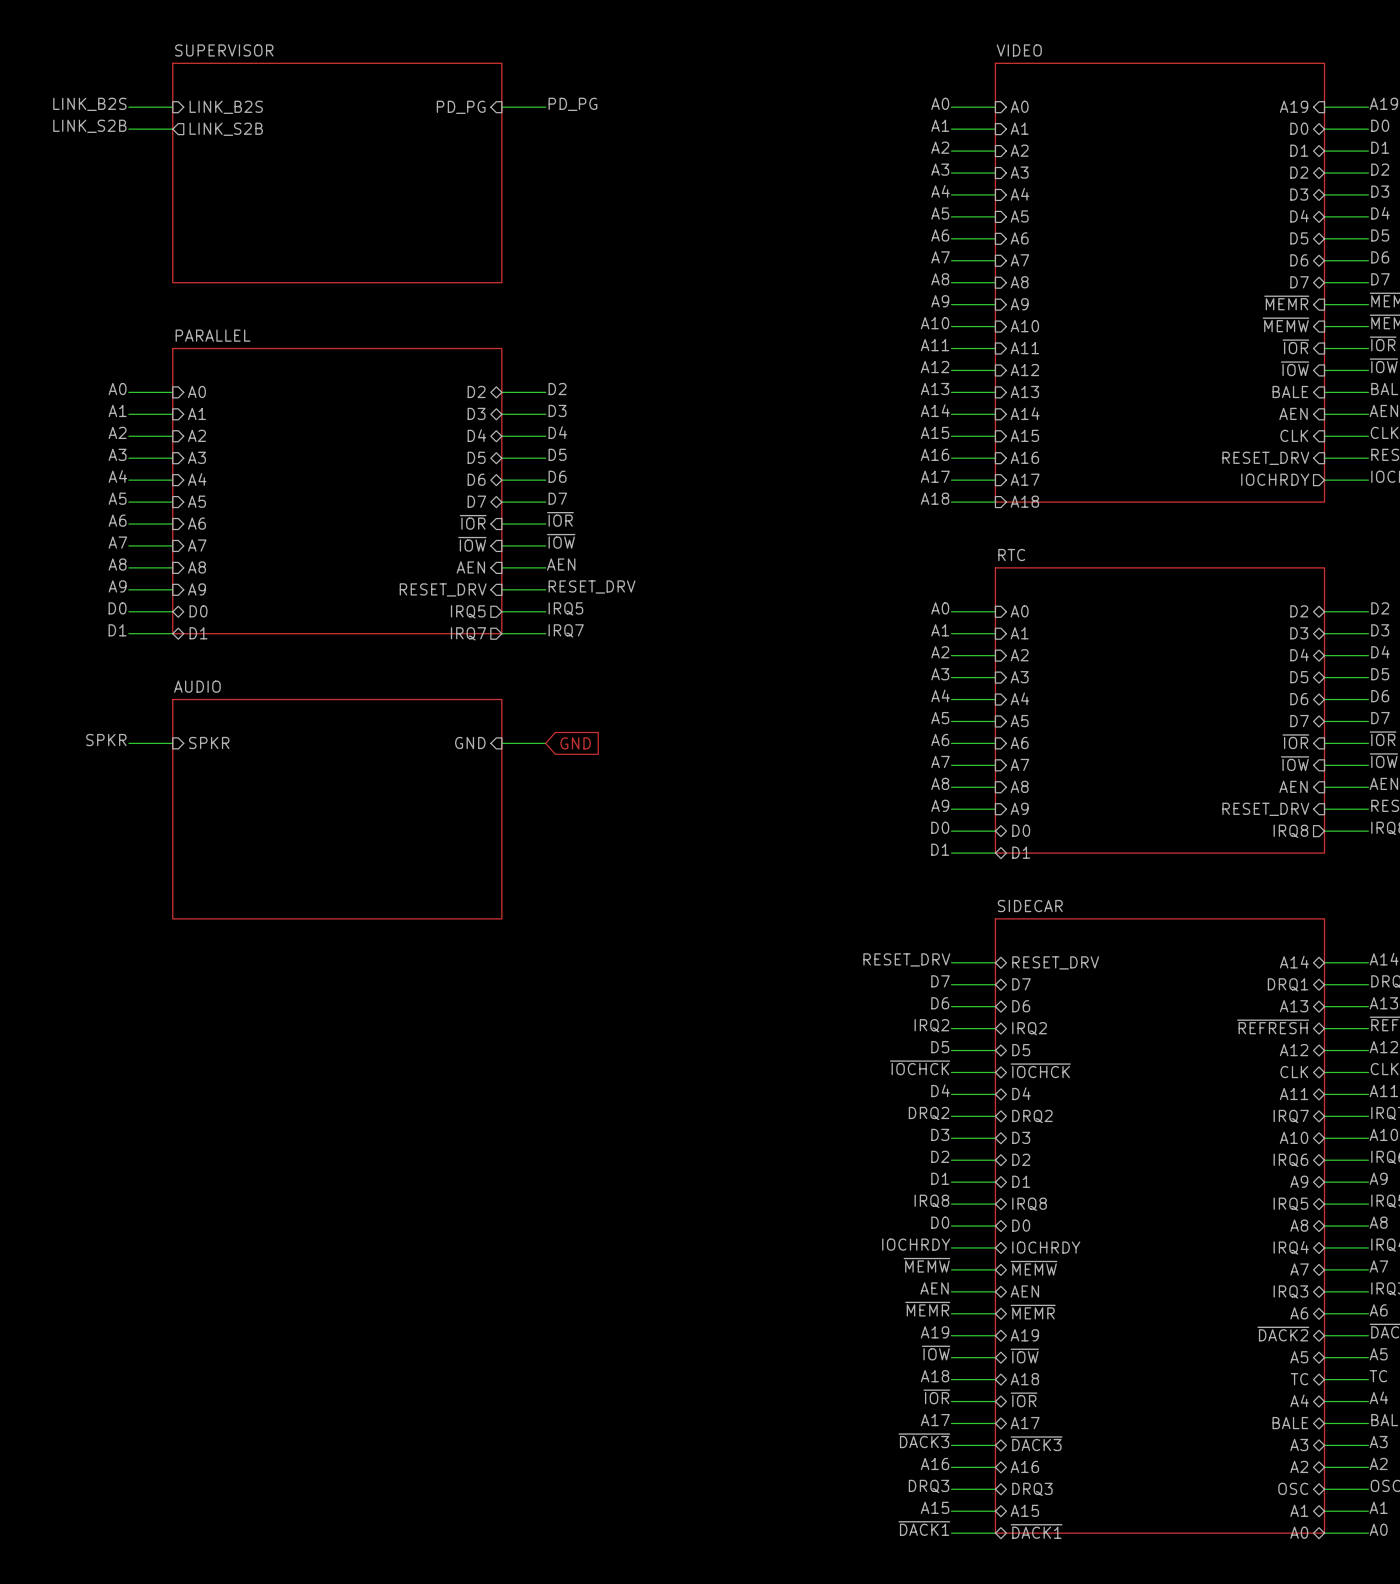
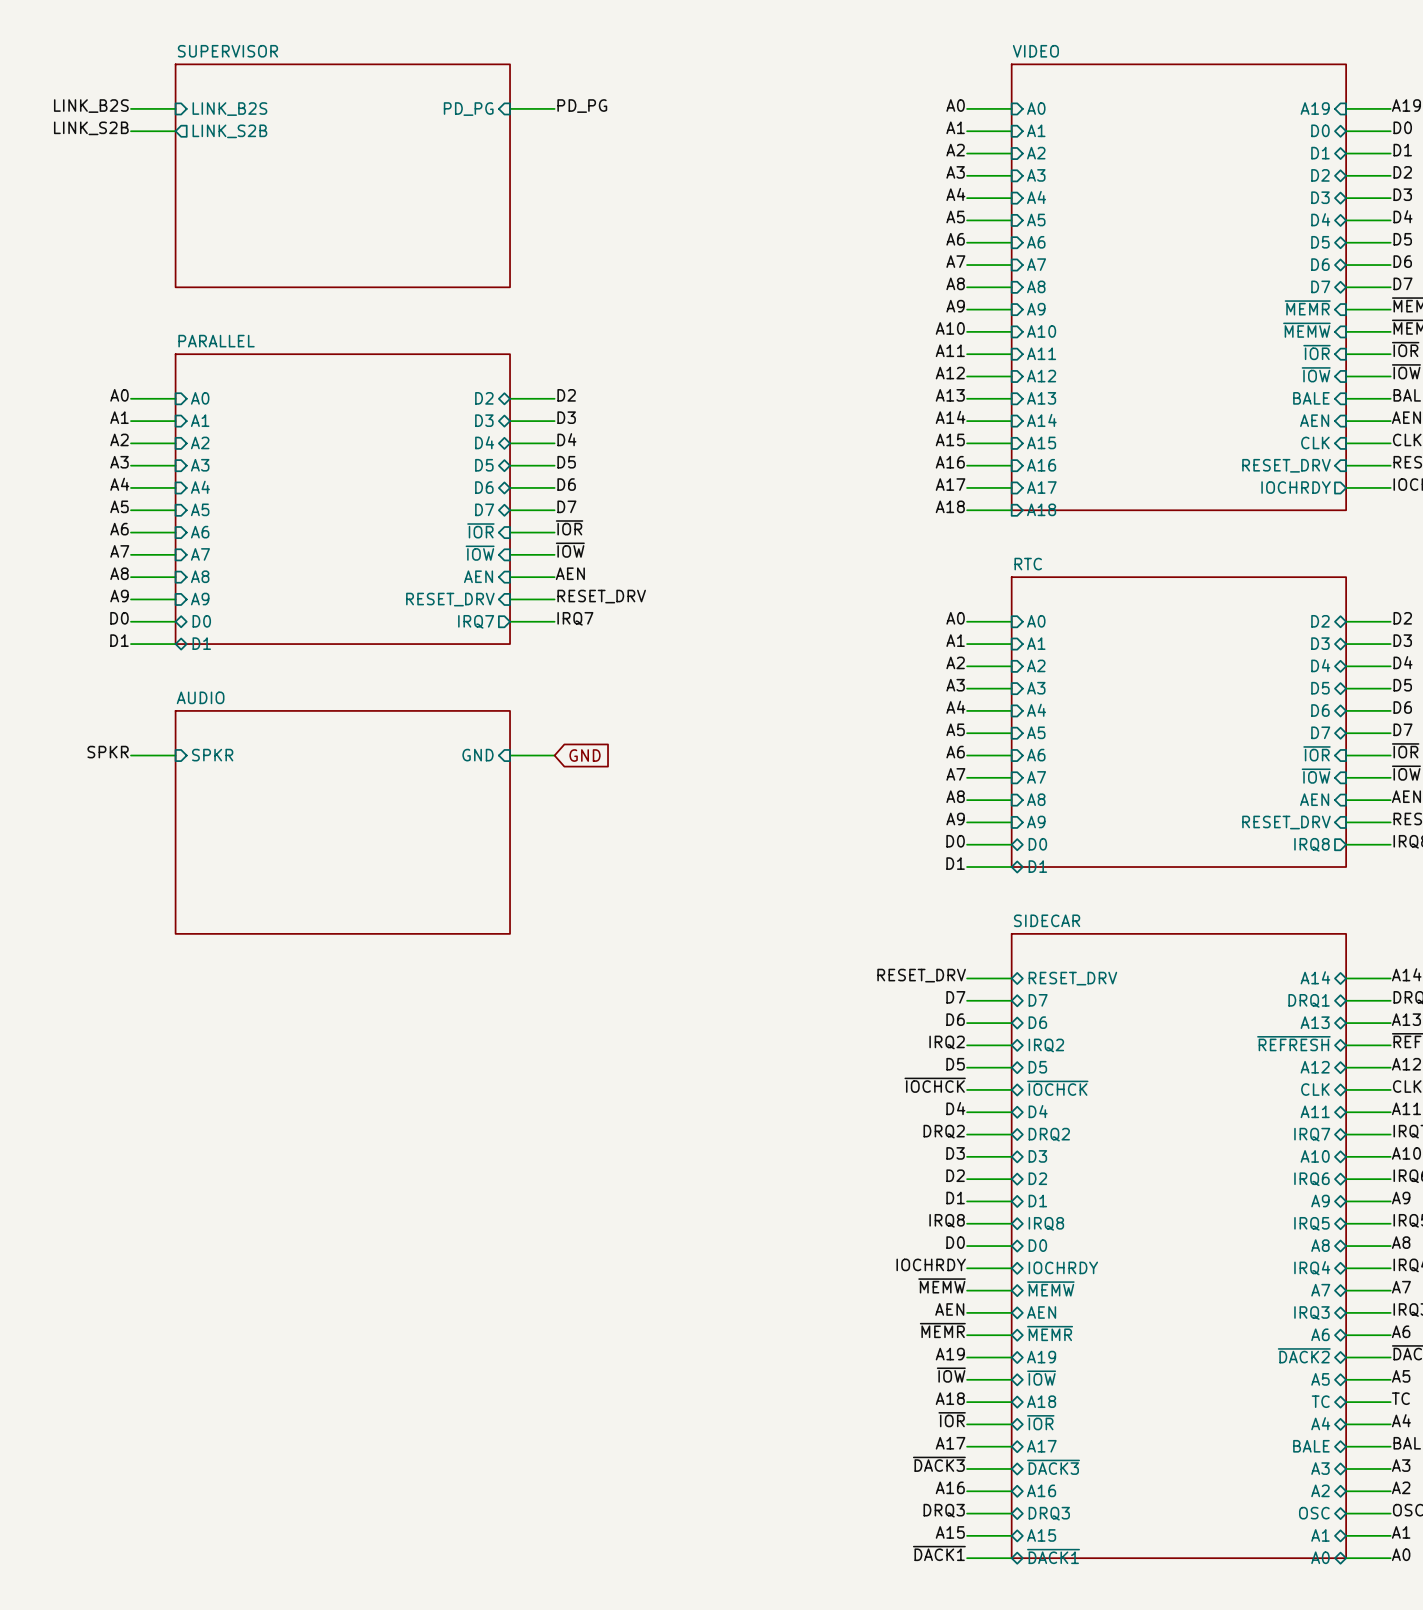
label: IRQ5 (565, 608) -> IRQ7 (575, 618)
sheet pin: IRQ5 (468, 611) -> IRQ7 (476, 621)
label: IRQ7 (566, 630) -> none
sheet pin: IRQ7 (468, 633) -> none
wire: (501, 633) (545, 633) -> none

